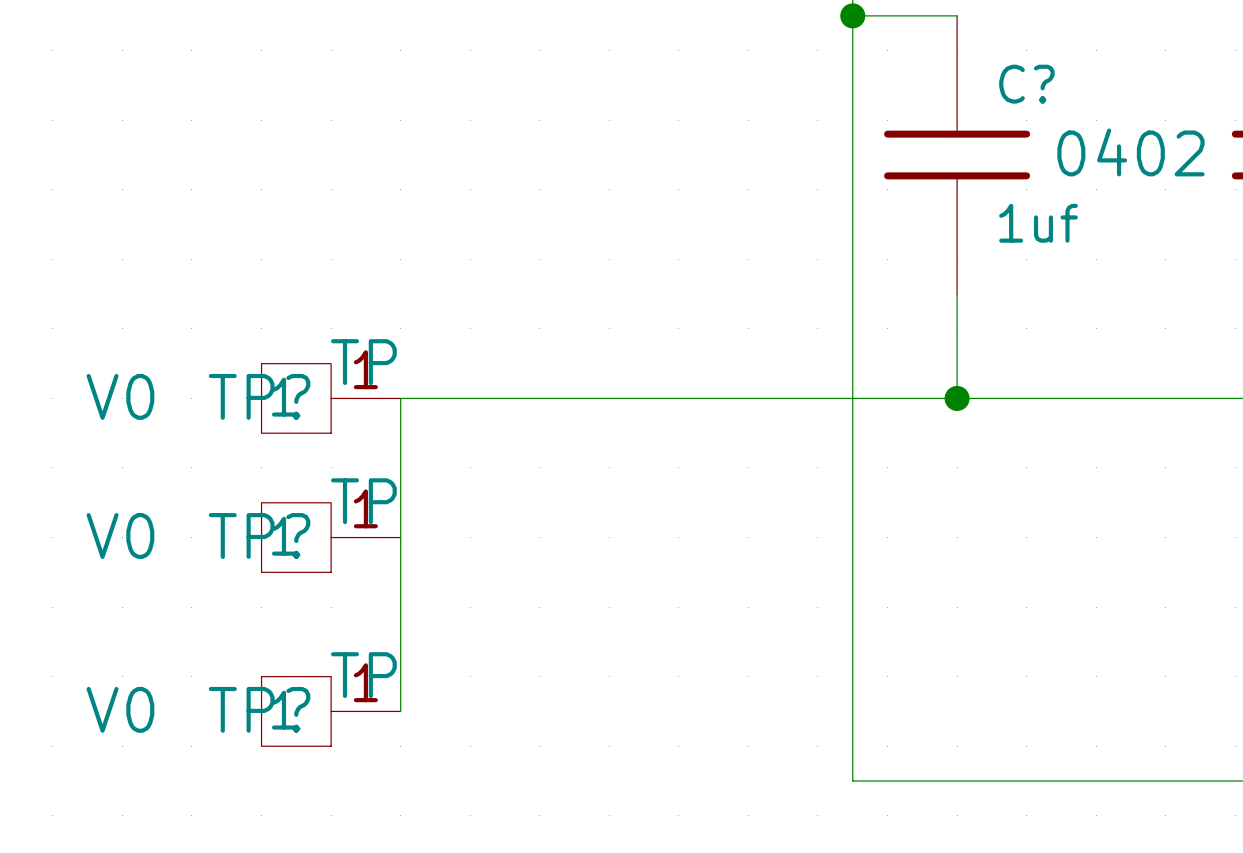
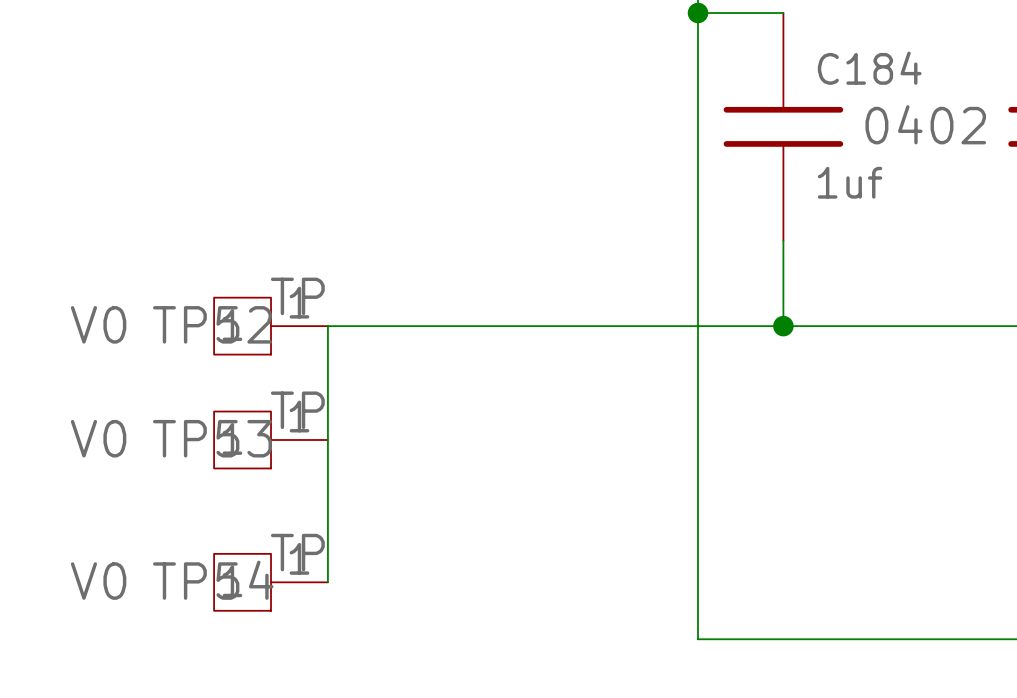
C? name: C? (1026, 84) -> C184 (869, 68)
TP? name: TP? (259, 396) -> TP52 (212, 324)
TP? name: TP? (259, 535) -> TP53 (212, 438)
TP? name: TP? (259, 709) -> TP54 (213, 580)

